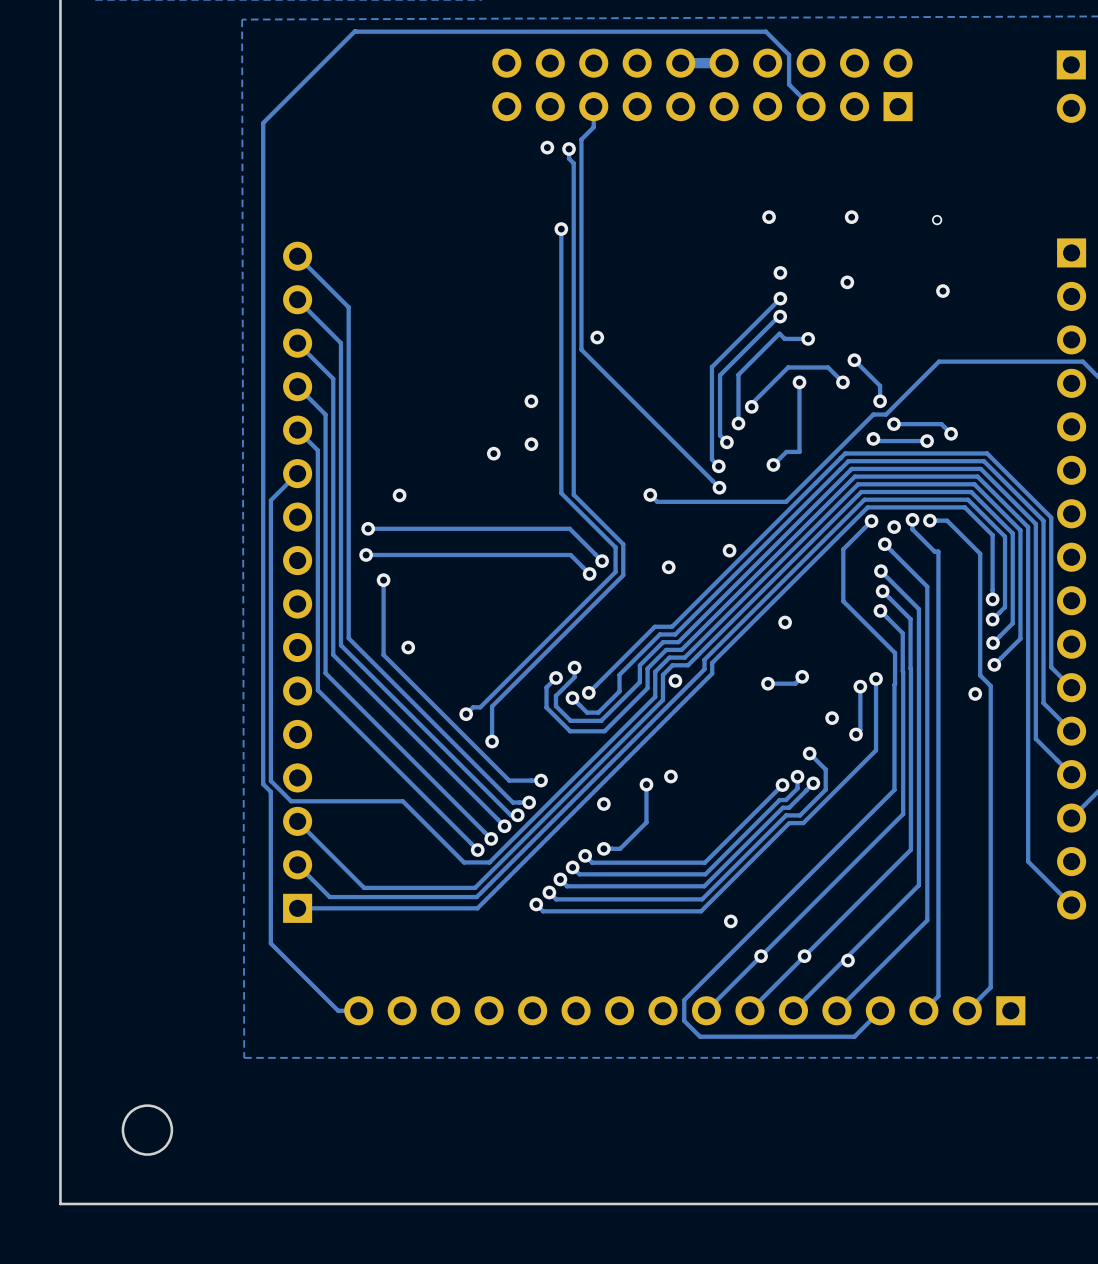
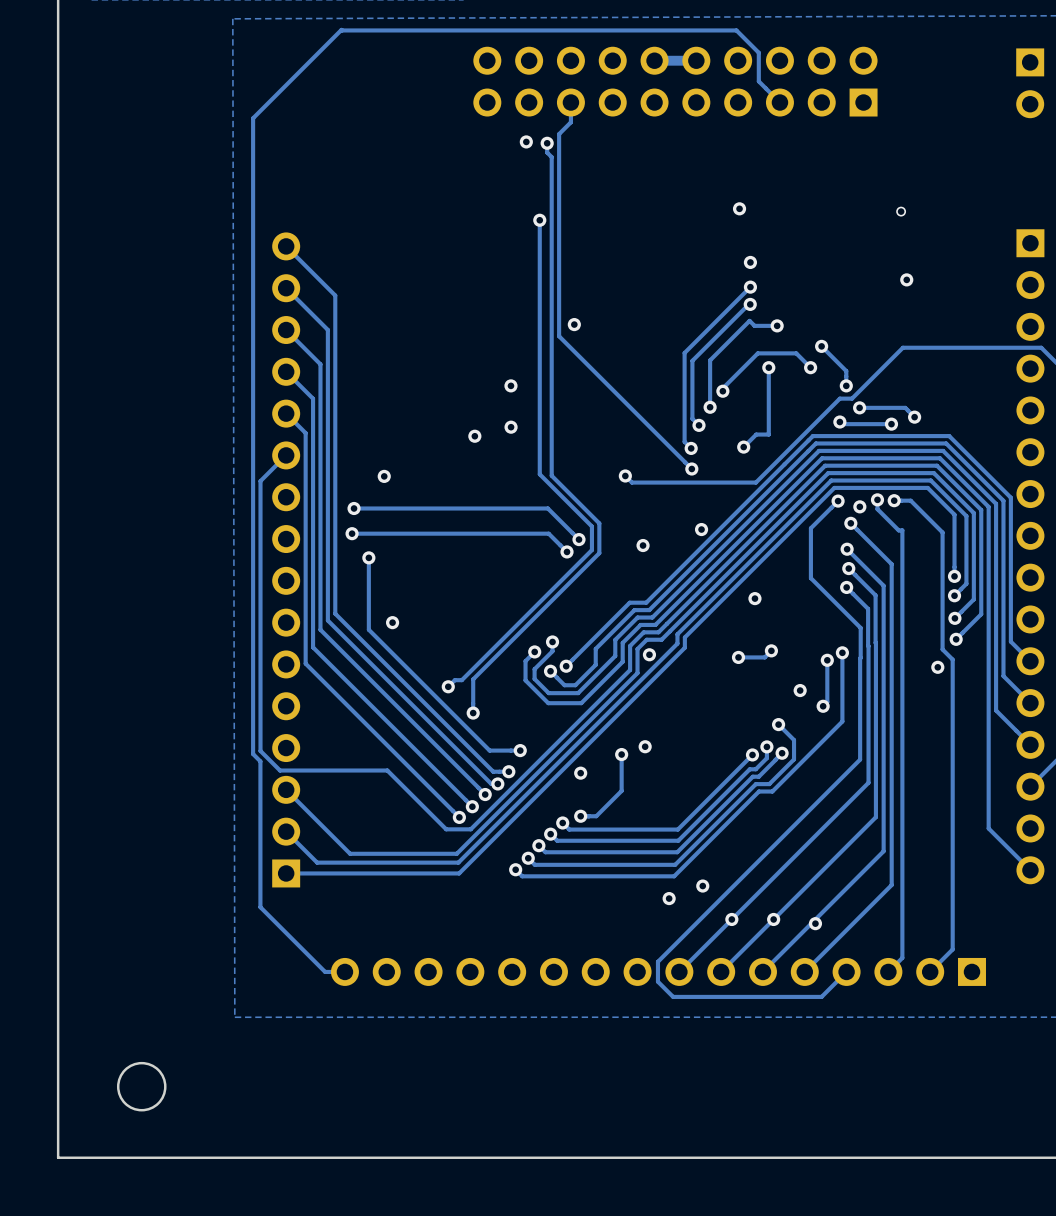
via: (851, 217) -> none
via: (847, 282) -> none
via: none -> (669, 898)

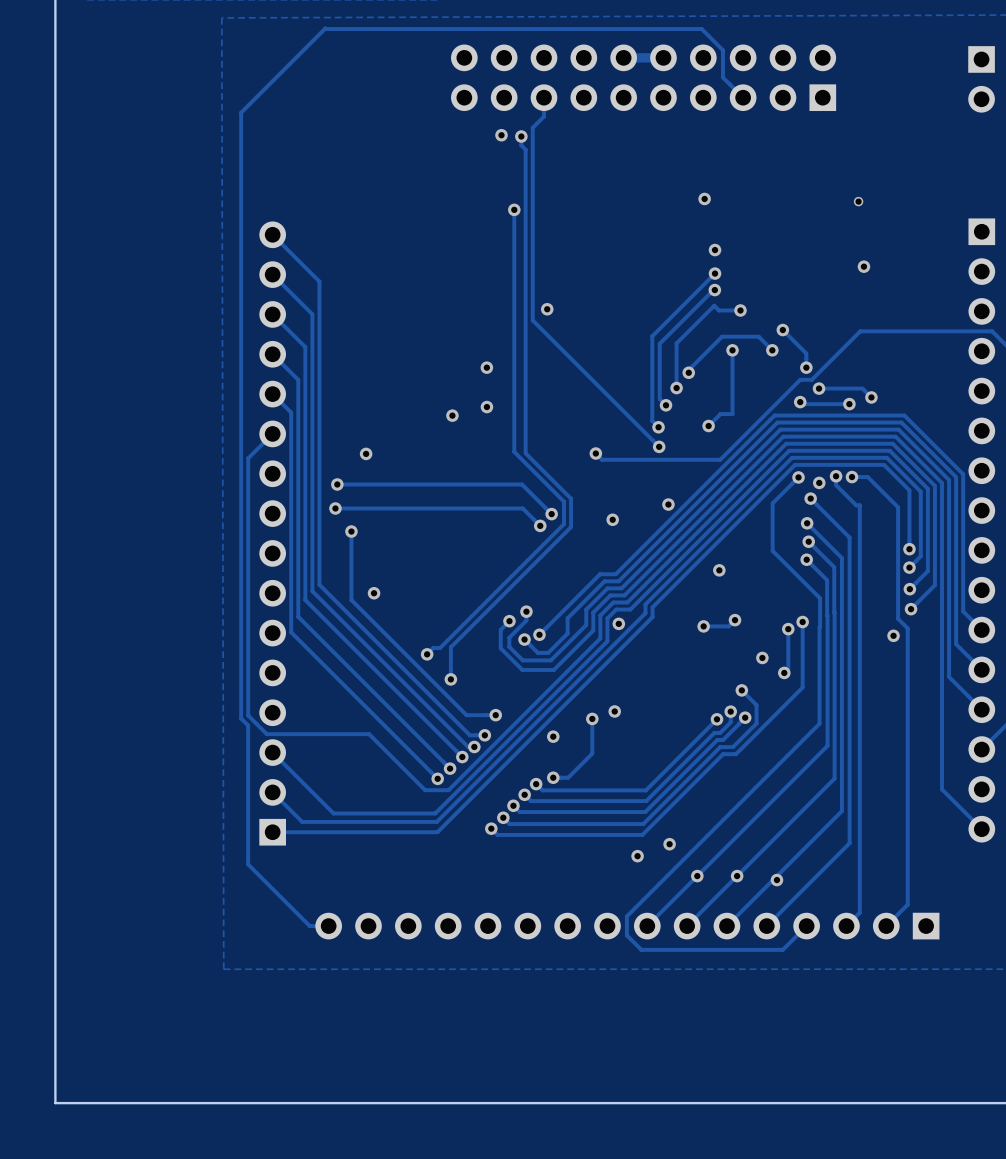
round board edge: [116, 1061, 167, 1112] -> none

